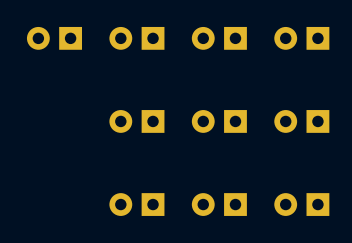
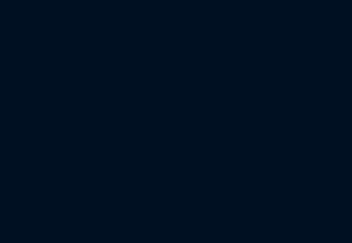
part: (54, 38) -> none
part: (136, 38) -> none
part: (219, 38) -> none
part: (301, 38) -> none
part: (136, 121) -> none
part: (219, 121) -> none
part: (301, 121) -> none
part: (136, 204) -> none
part: (219, 204) -> none
part: (301, 204) -> none

